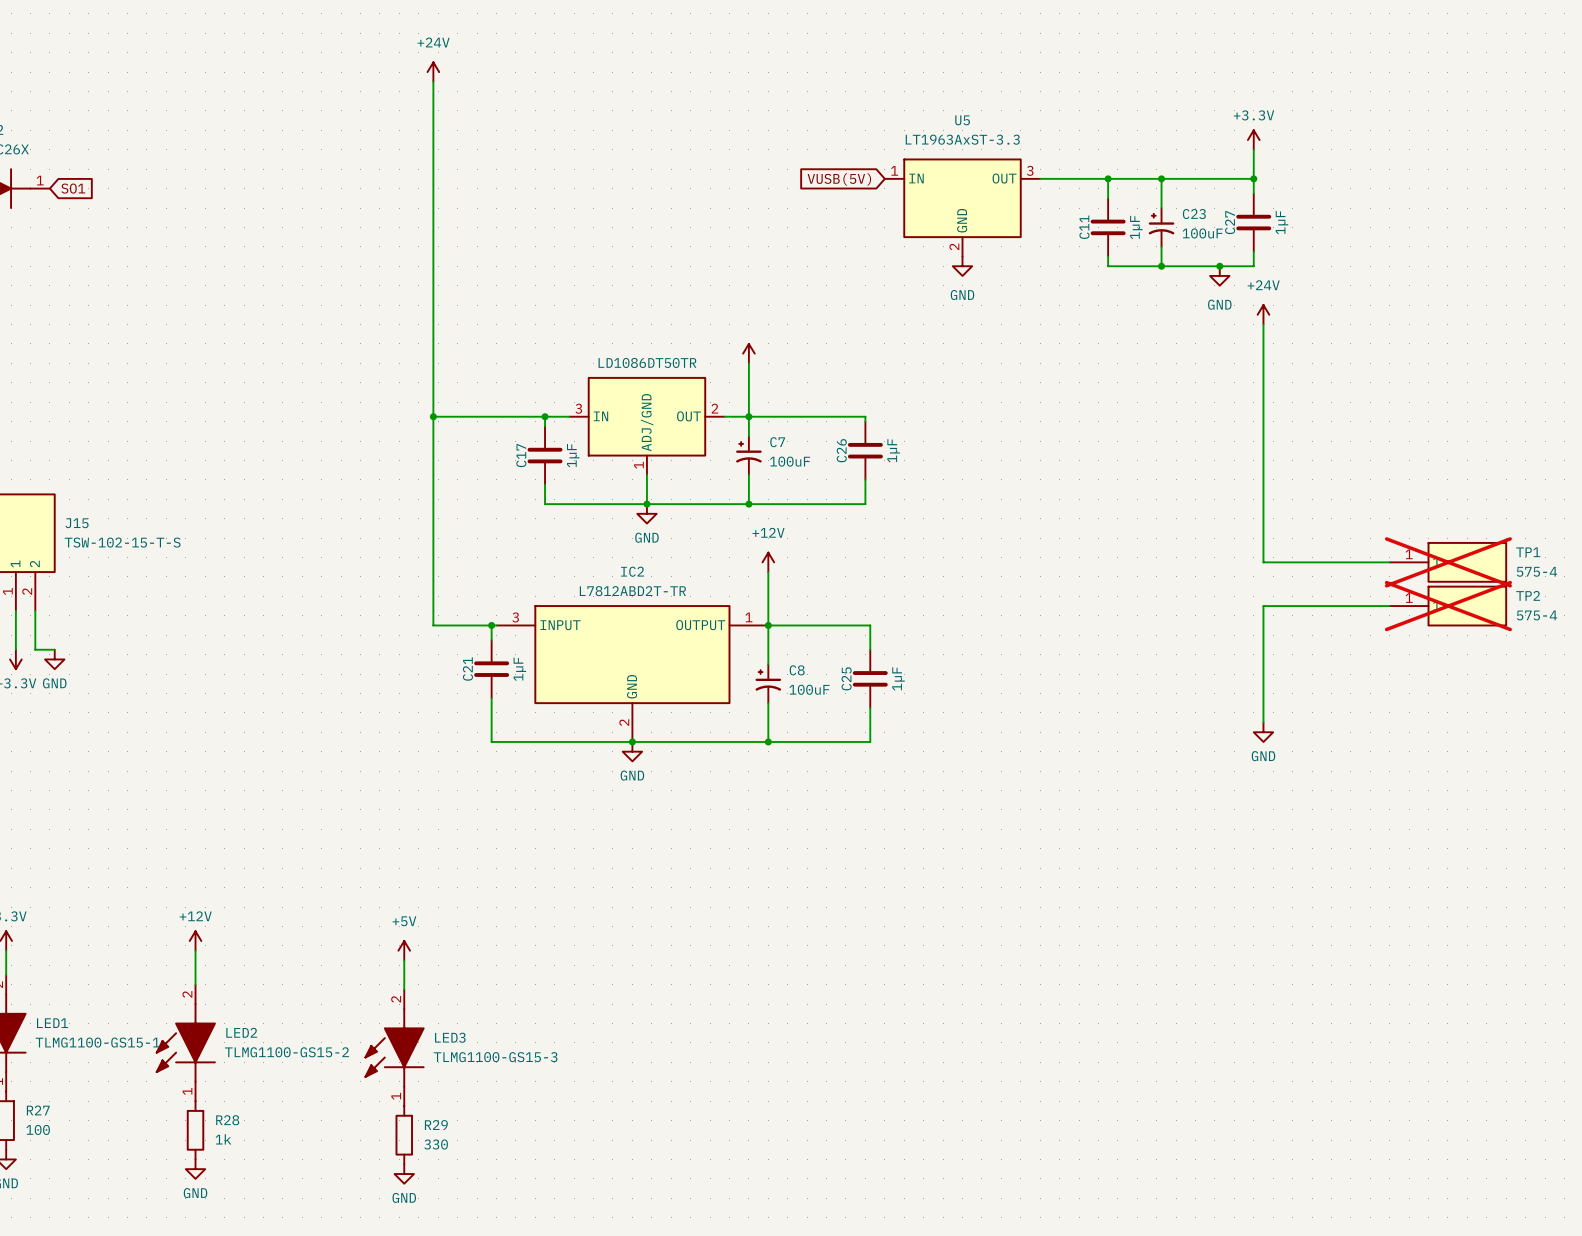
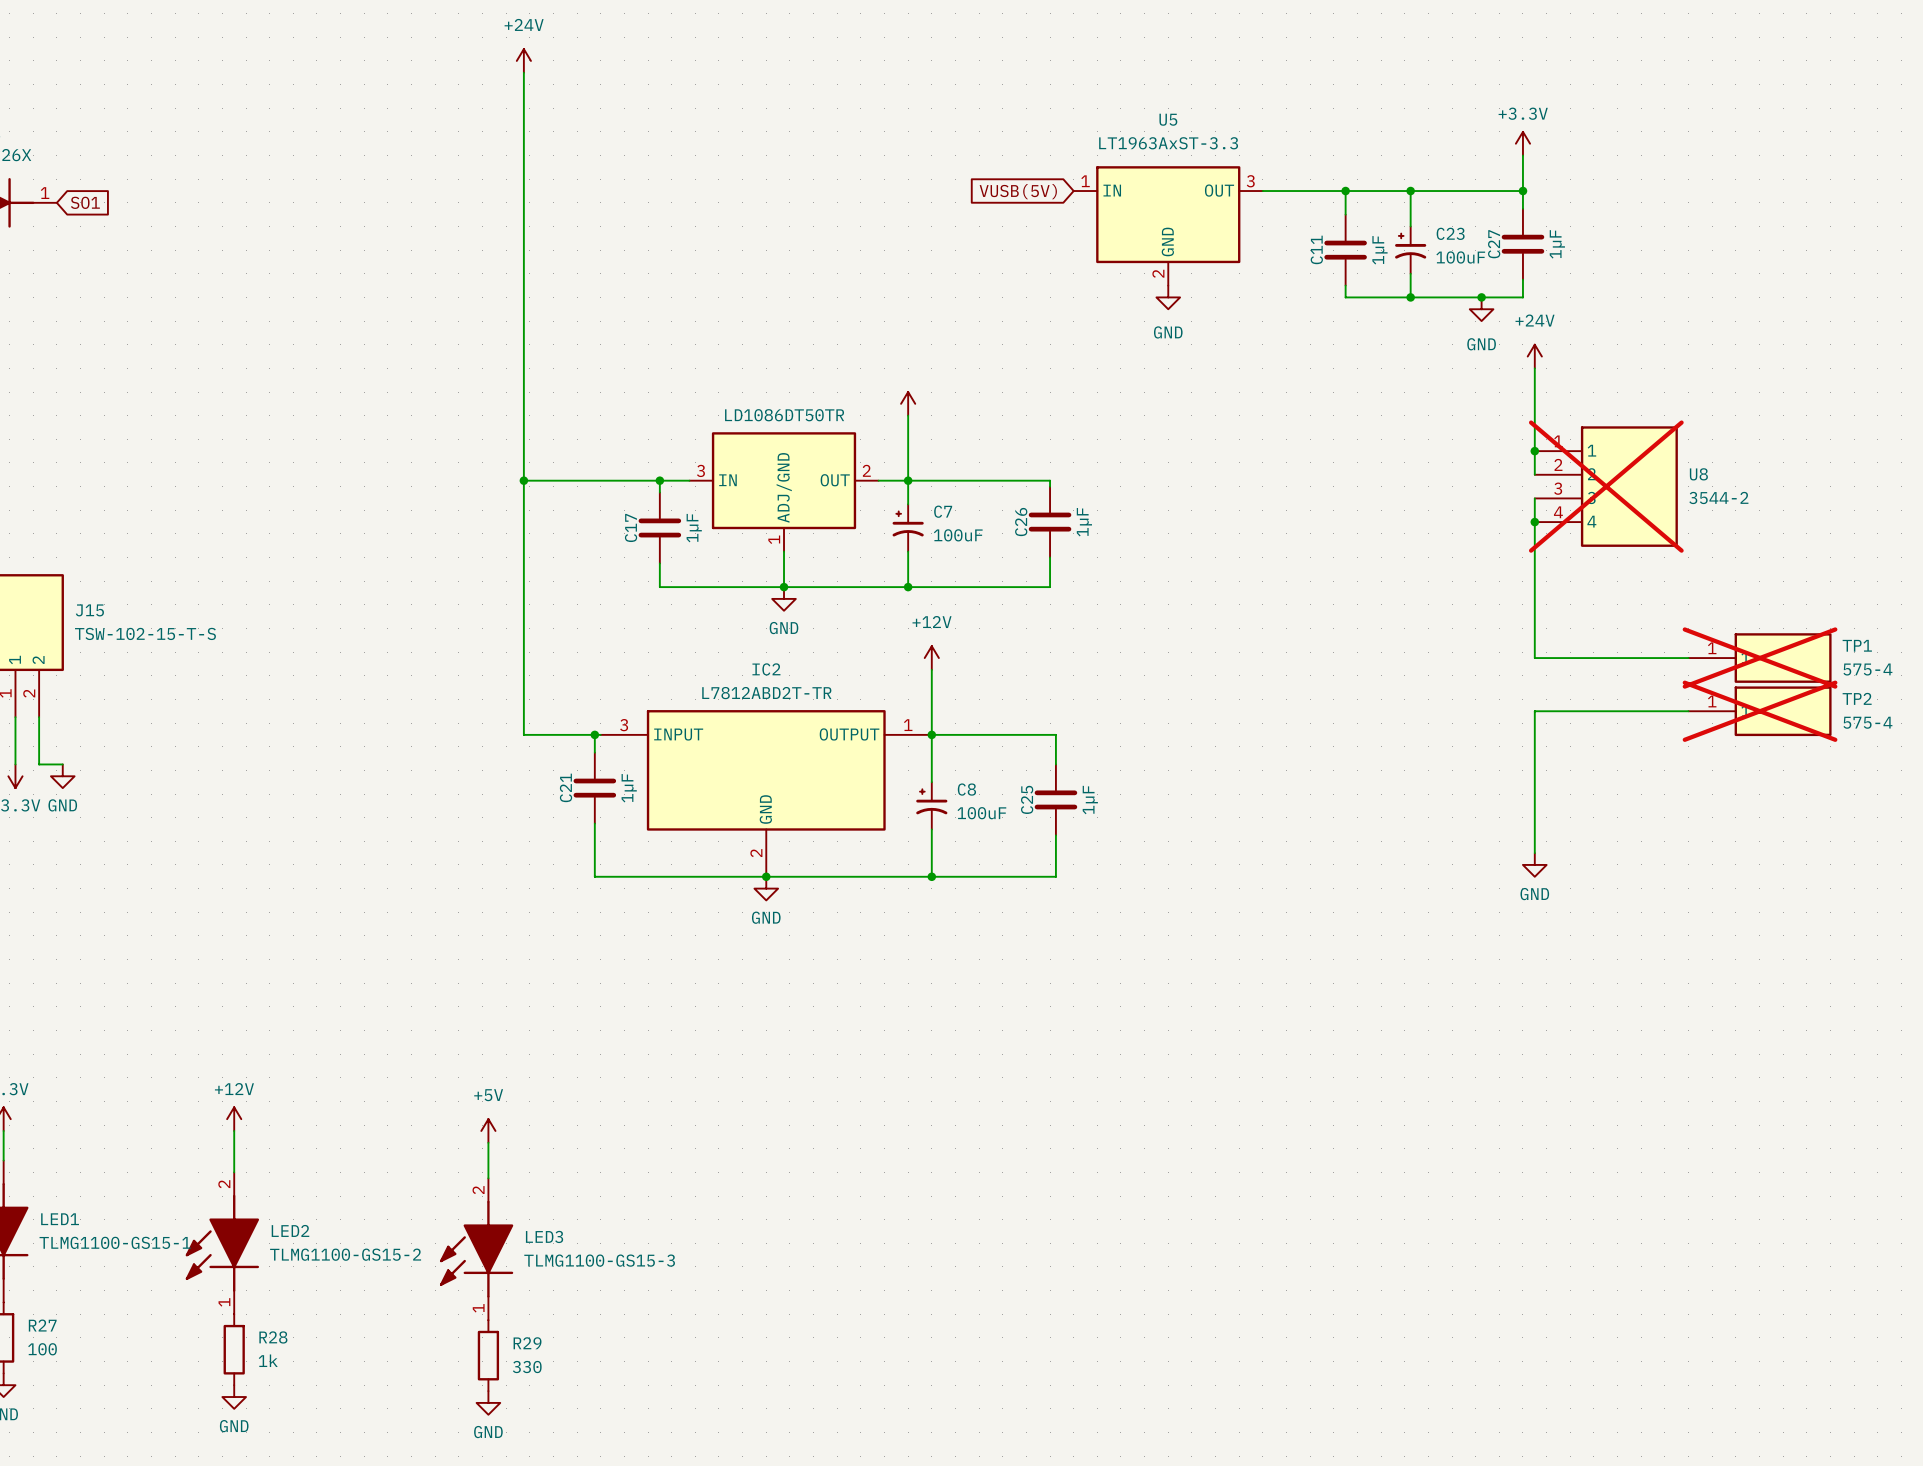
junction: none -> (1534, 451)
wire: (1263, 411) (1263, 431) -> none
U8: none -> 3544-2 (1606, 486)
junction: none -> (1534, 522)

